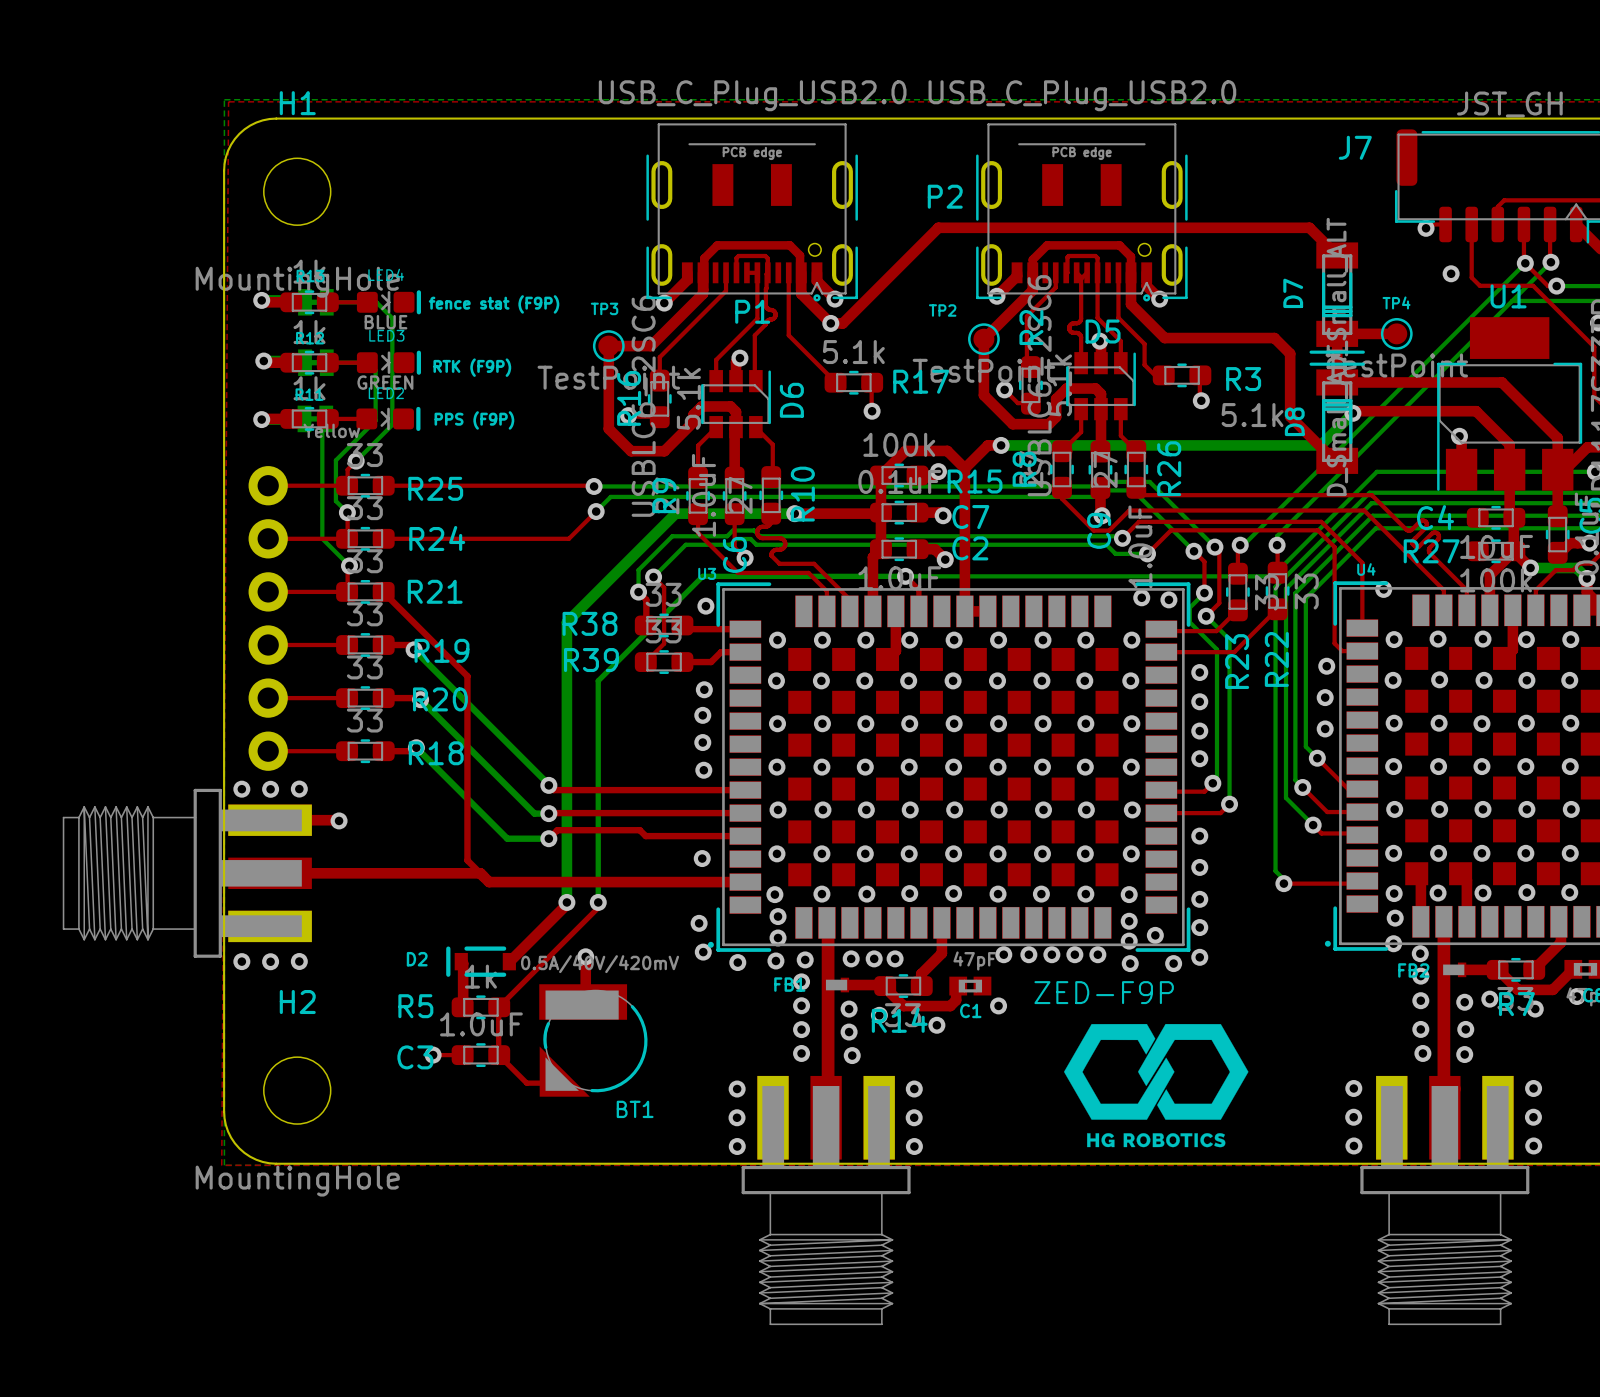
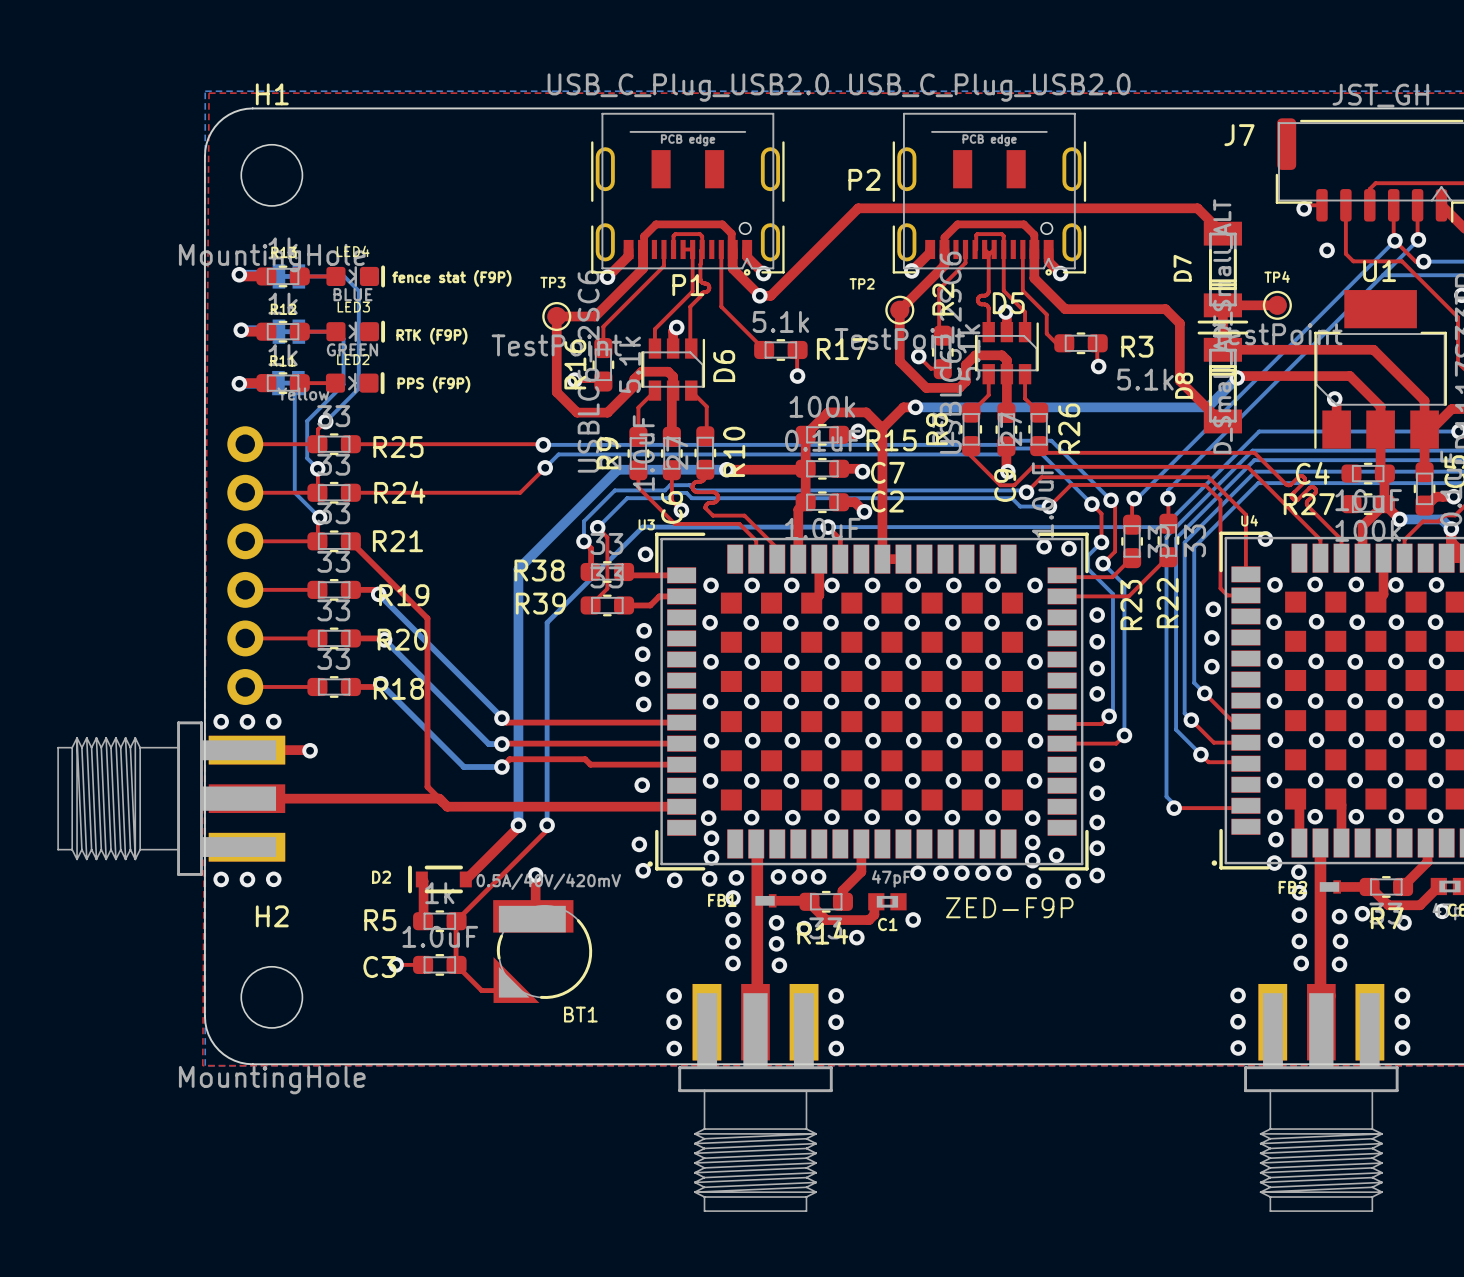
drawing: [1063, 1024, 1249, 1148] -> none

